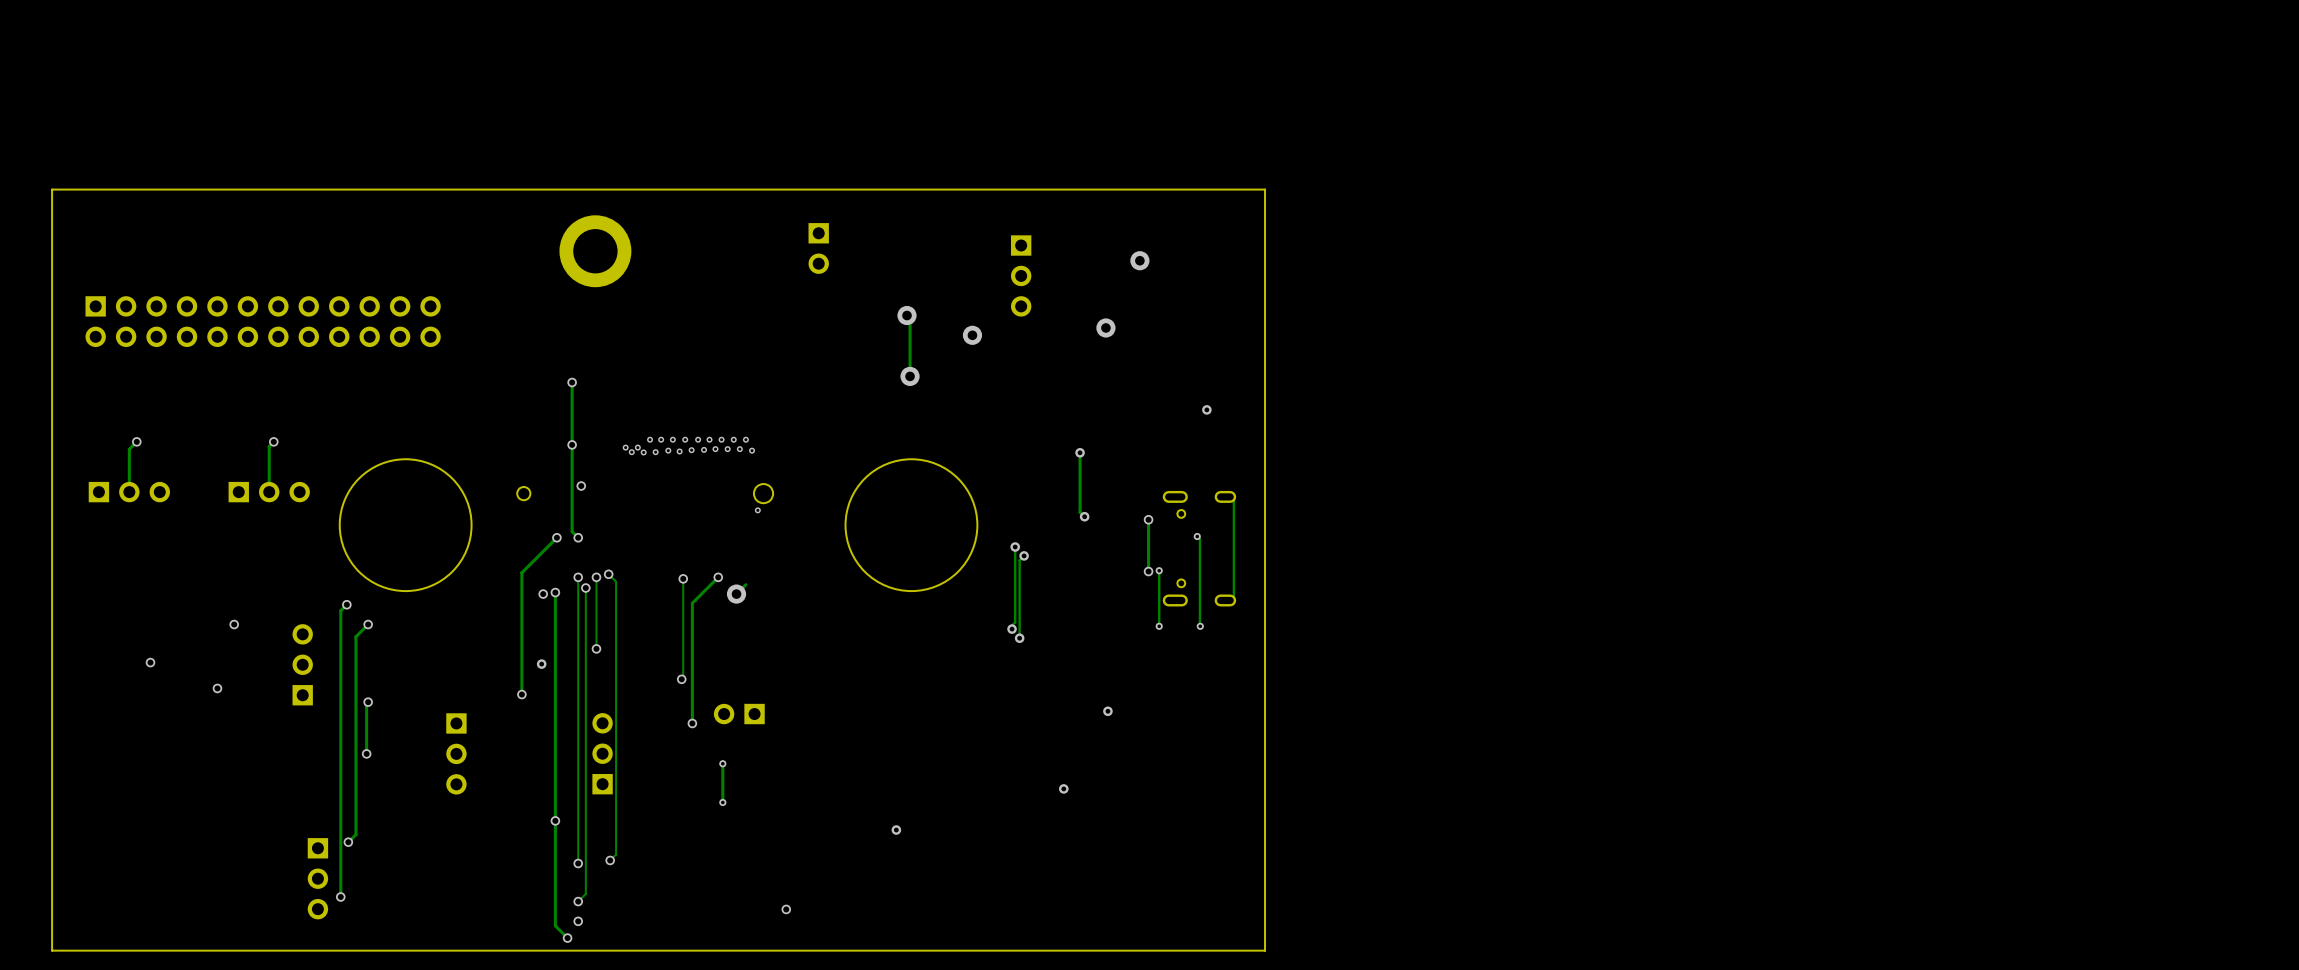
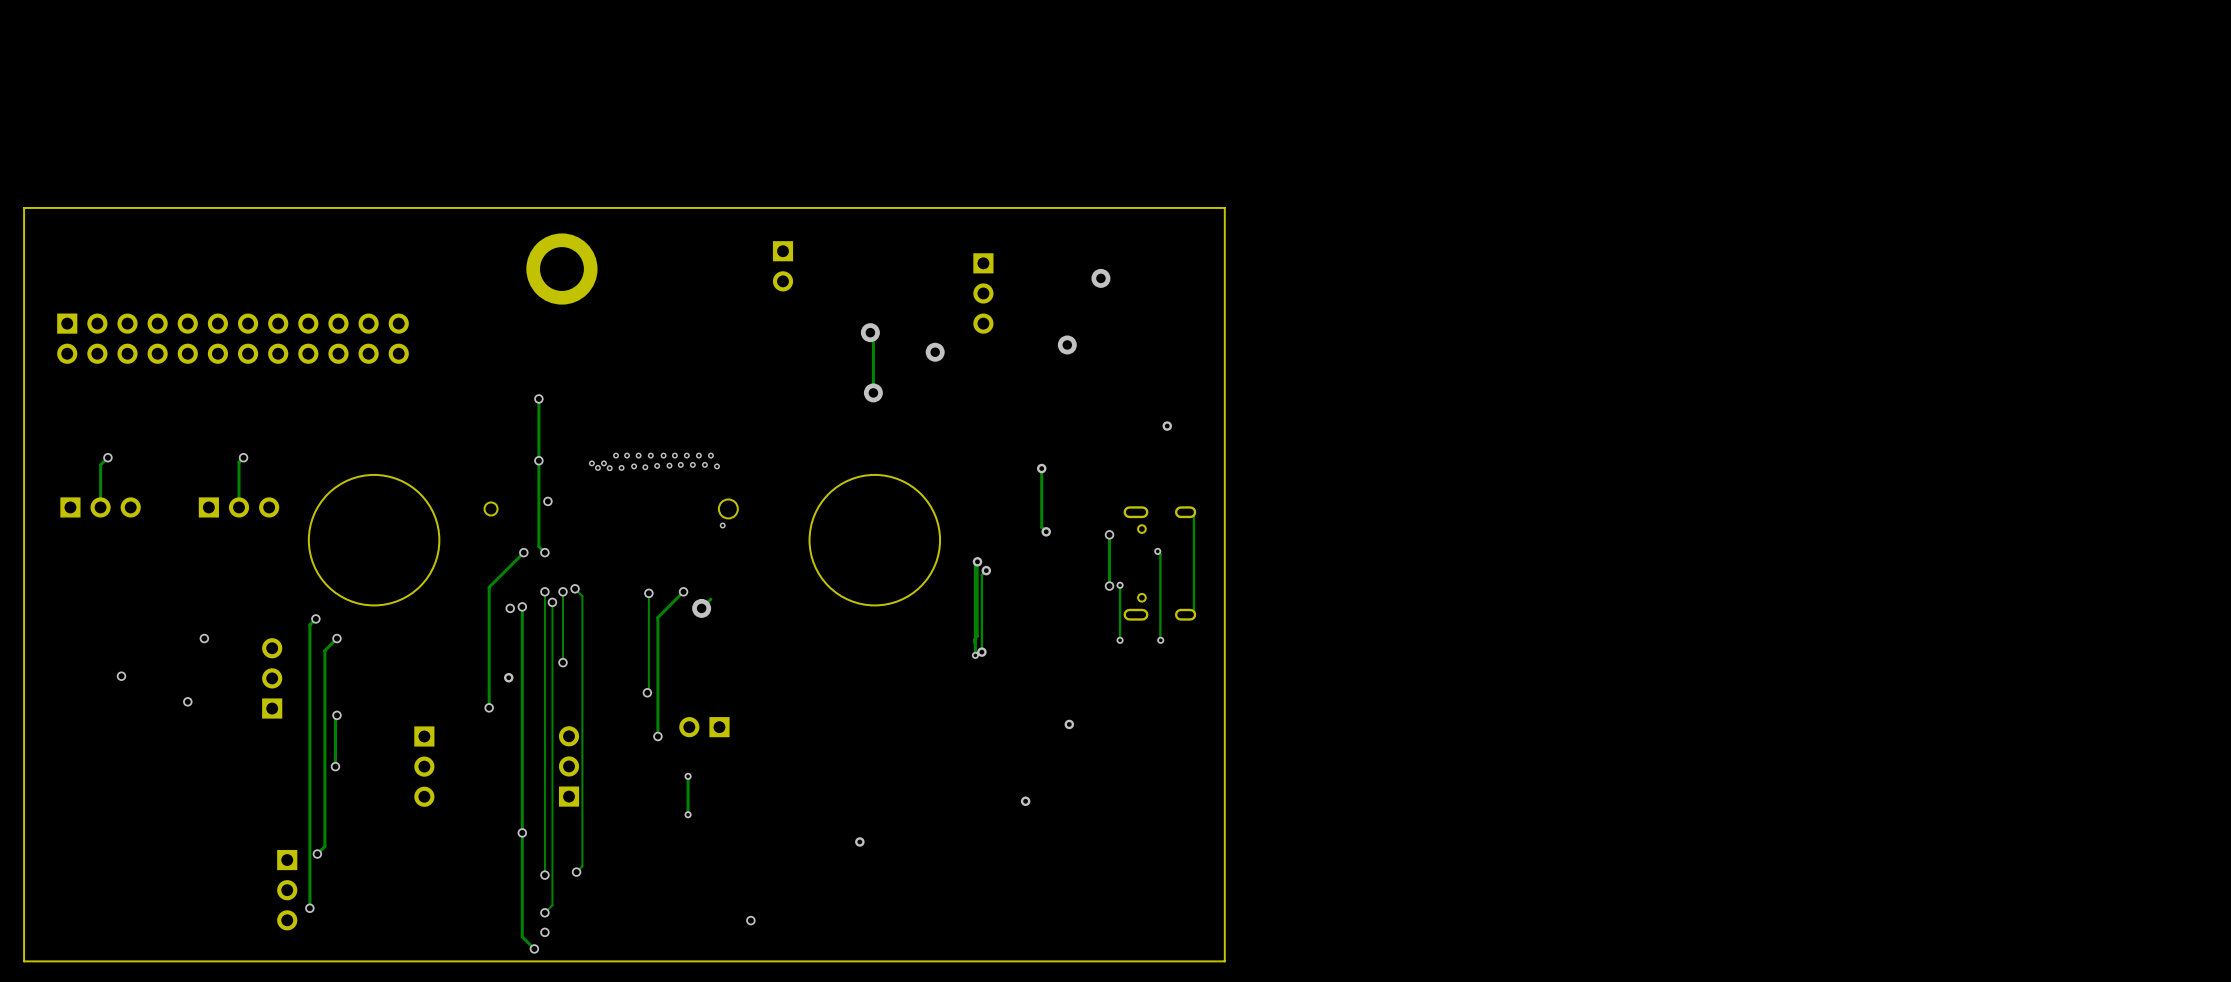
track: none -> (978, 558) (975, 561) (975, 655)
via: (1012, 629) -> none
via: none -> (975, 655)

